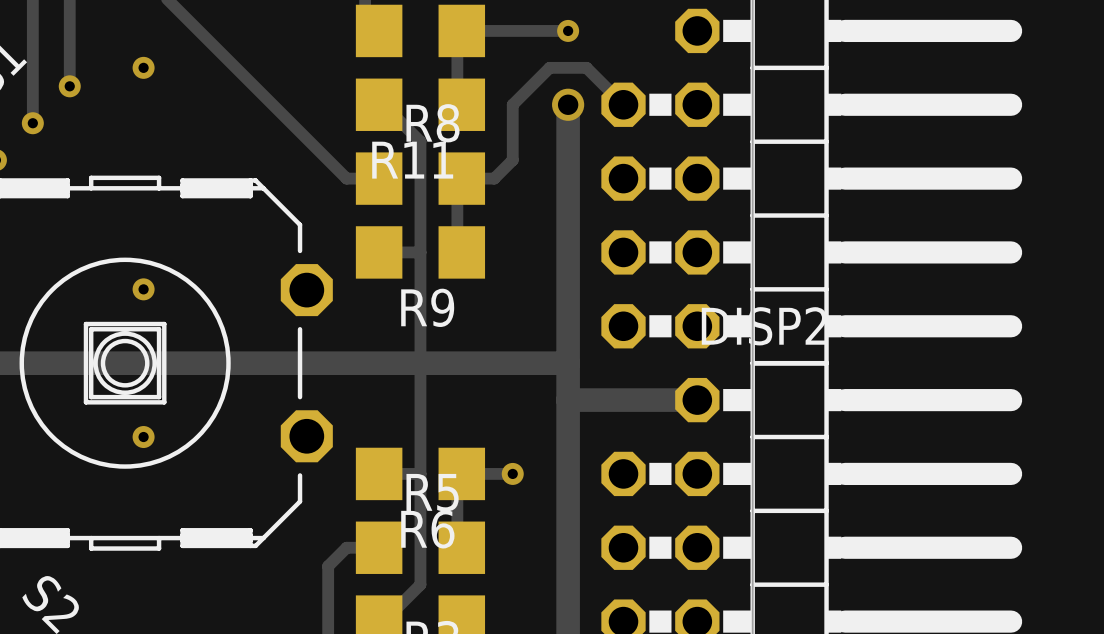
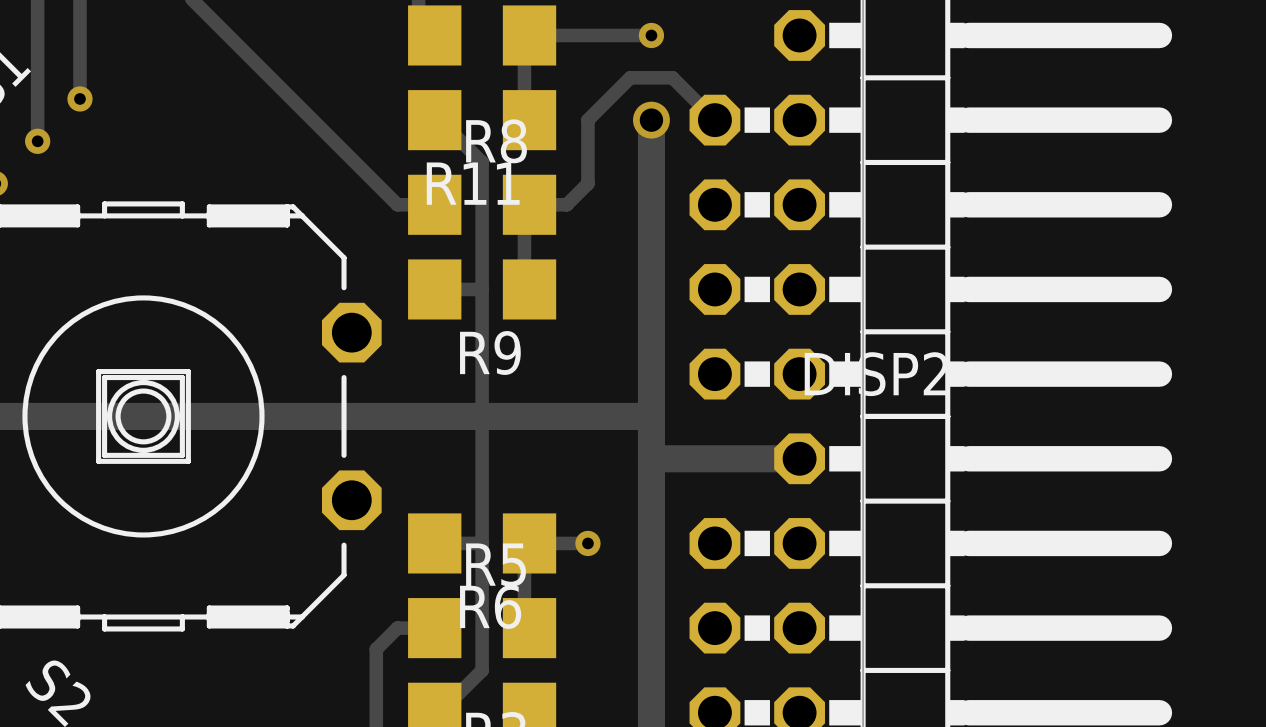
via: (143, 67) -> none
via: (143, 289) -> none
via: (143, 437) -> none

